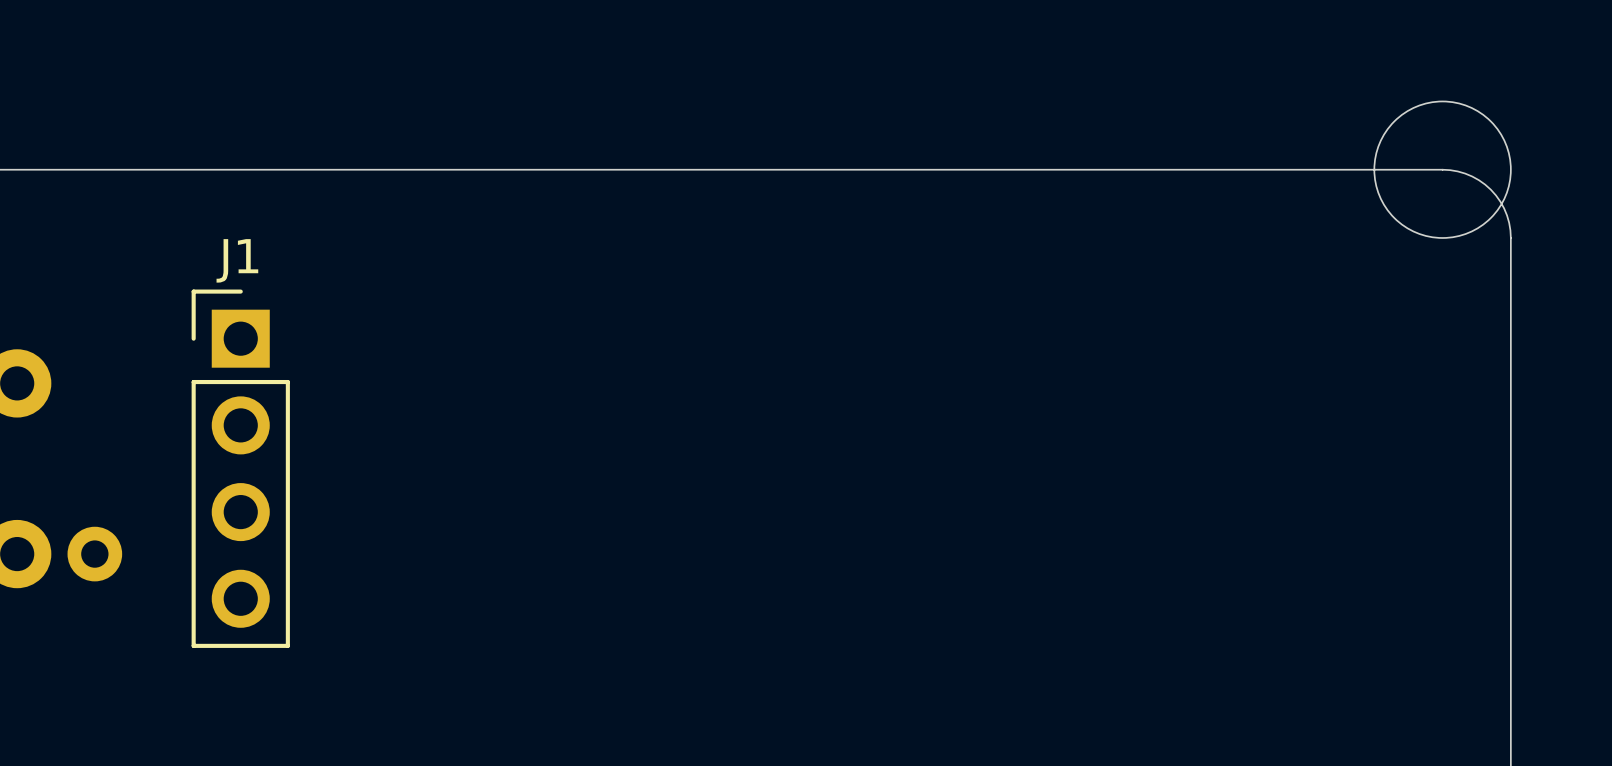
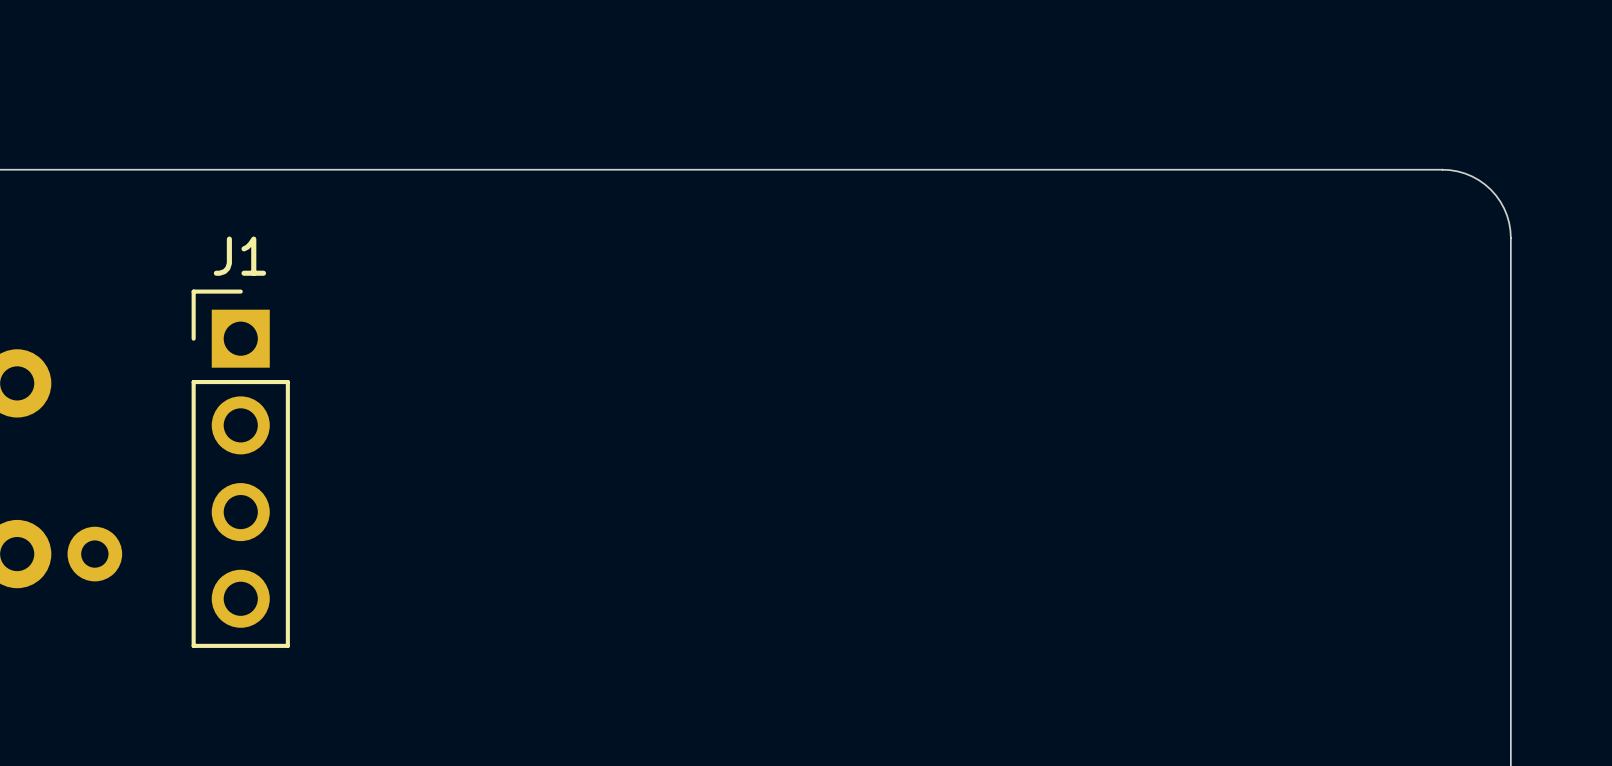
round board edge: [1373, 100, 1512, 239] -> none

